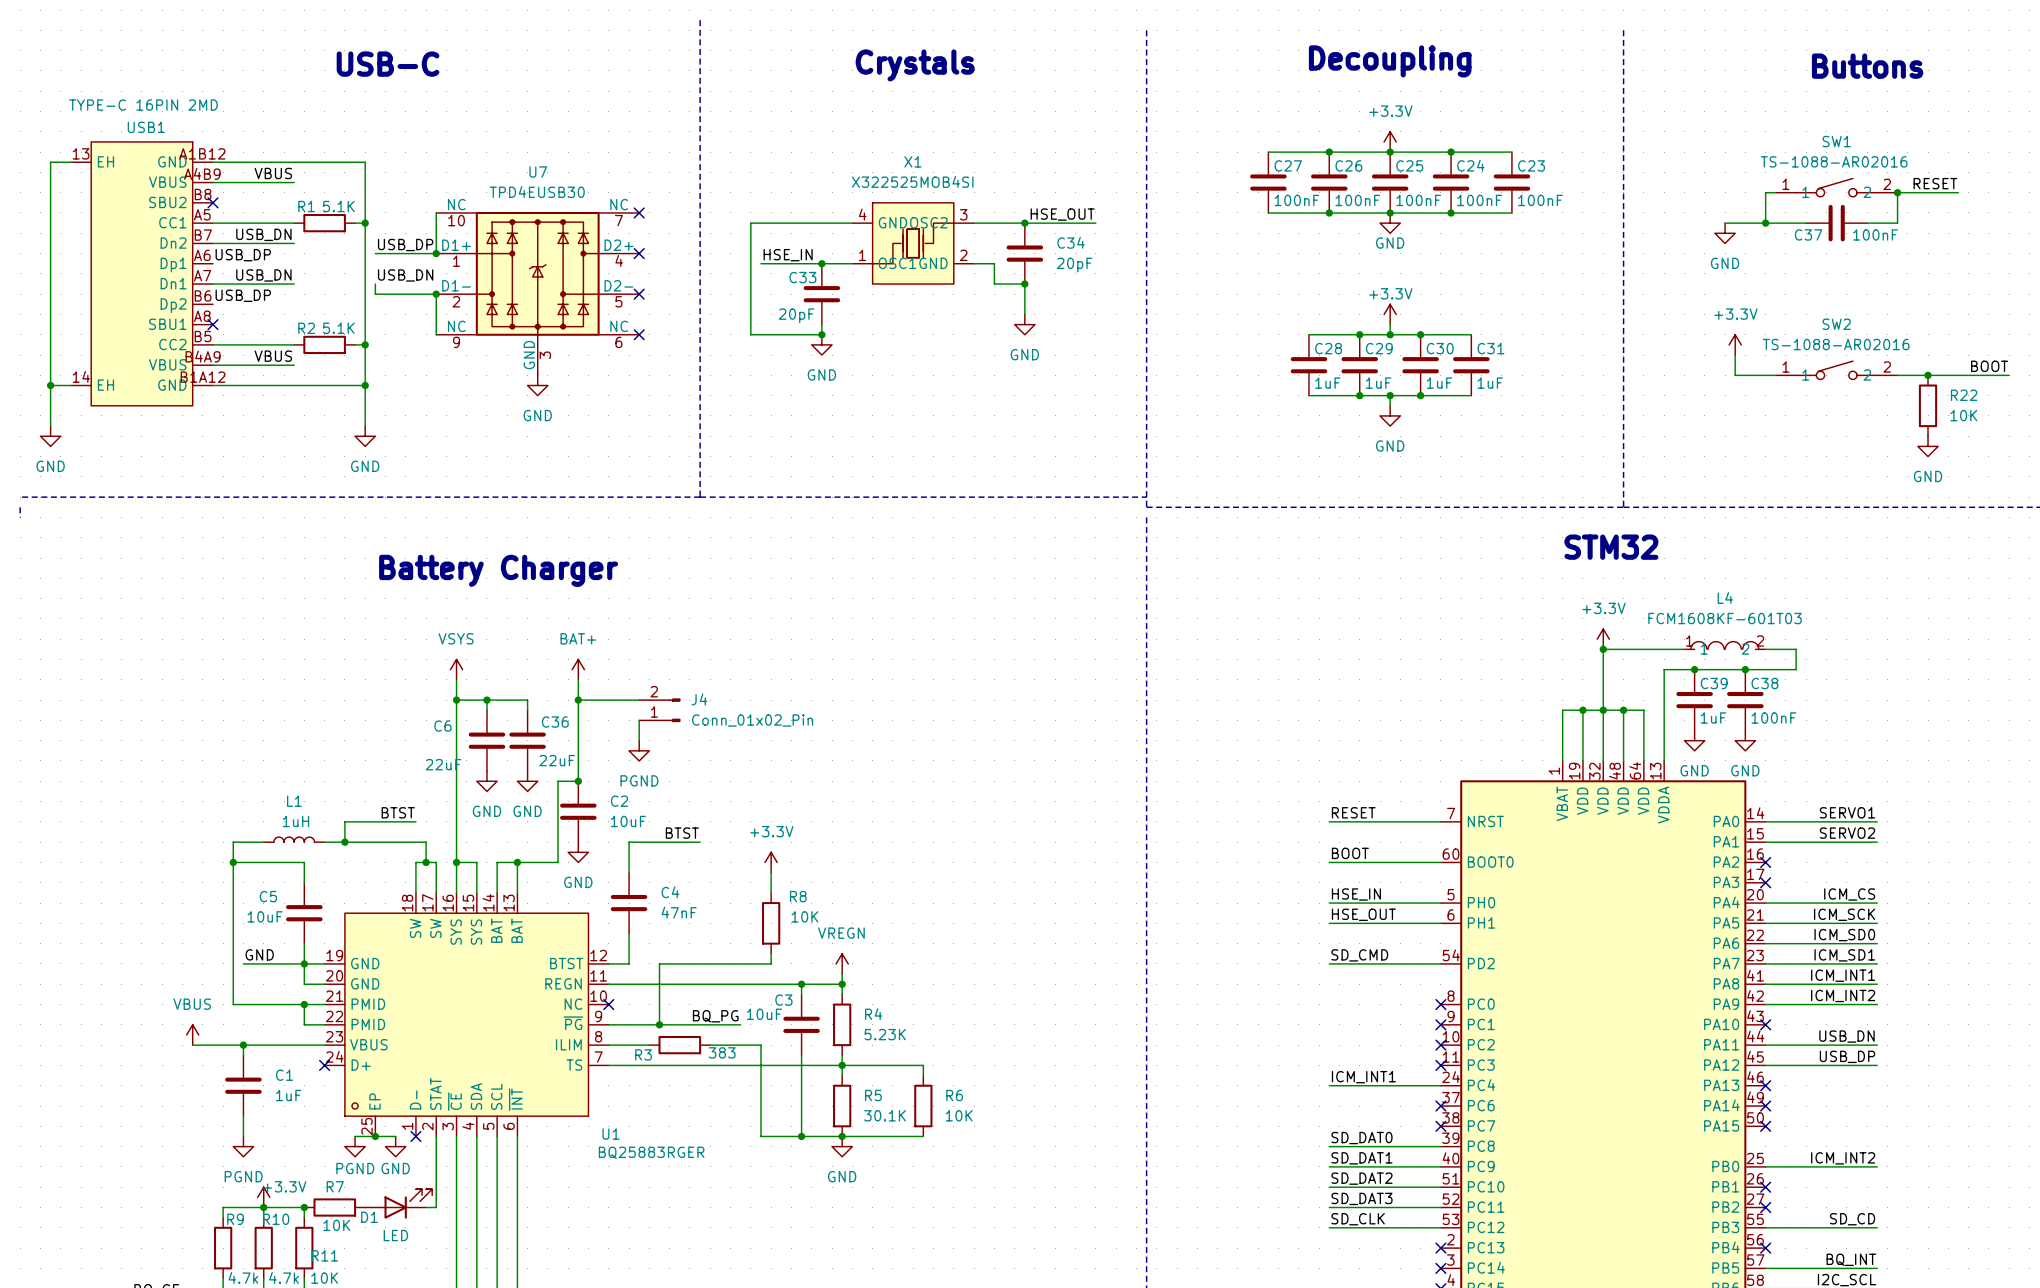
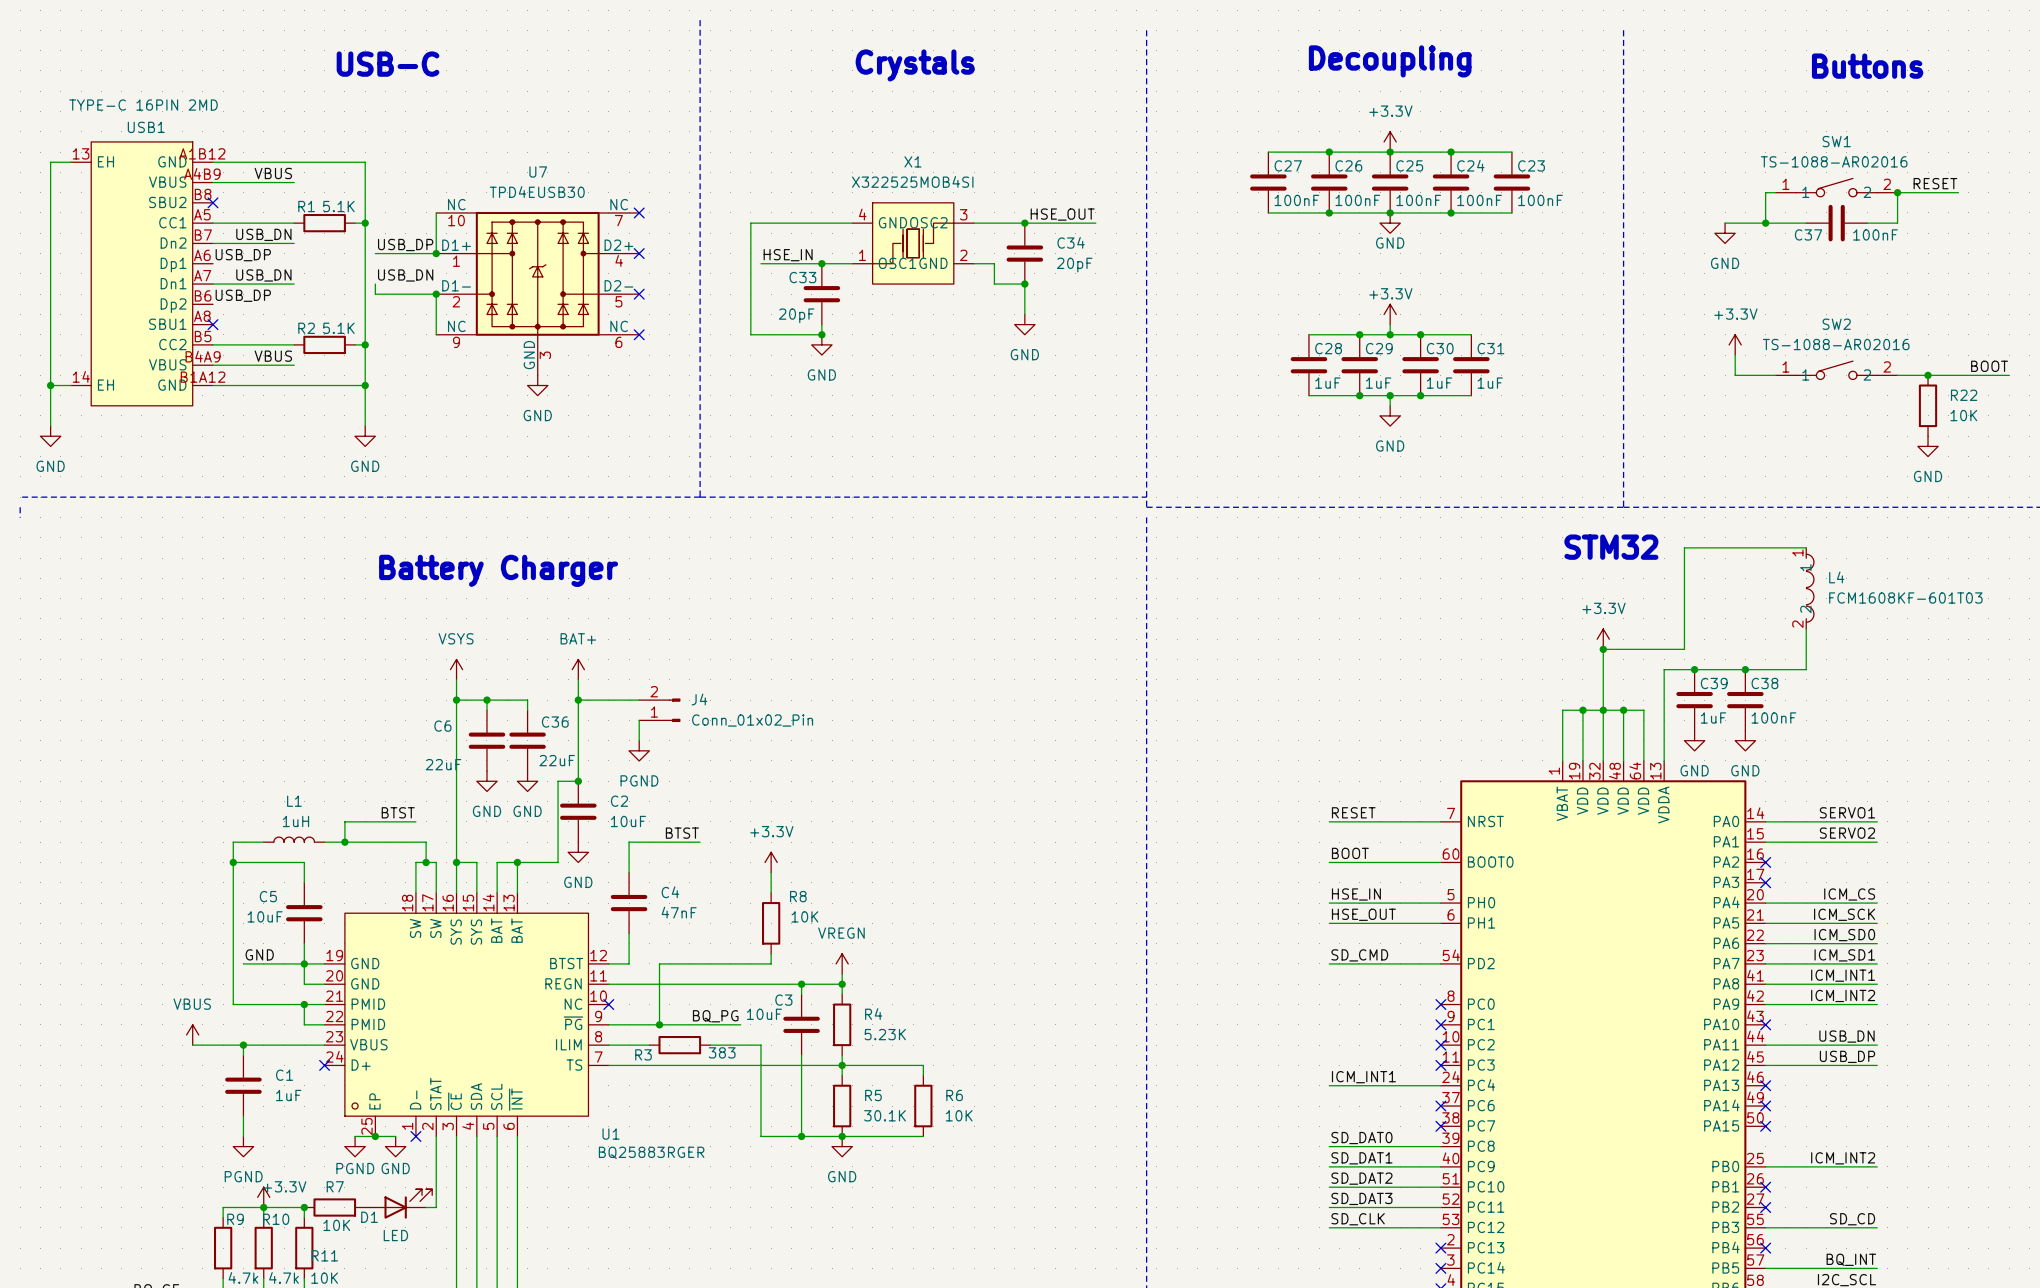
wire: none -> (1806, 547) (1684, 547) (1684, 649)
L4 name position: L4 (1725, 597) -> L4 (1836, 577)
L4 value position: FCM1608KF-601T03 (1725, 618) -> FCM1608KF-601T03 (1905, 597)
L4 rotation: 0° (1724, 645) -> 90° clockwise (1810, 588)
L4 position: (1725, 645) -> (1810, 588)
wire: (1765, 649) (1796, 649) (1796, 669) -> (1806, 629) (1806, 669) (1796, 669)

